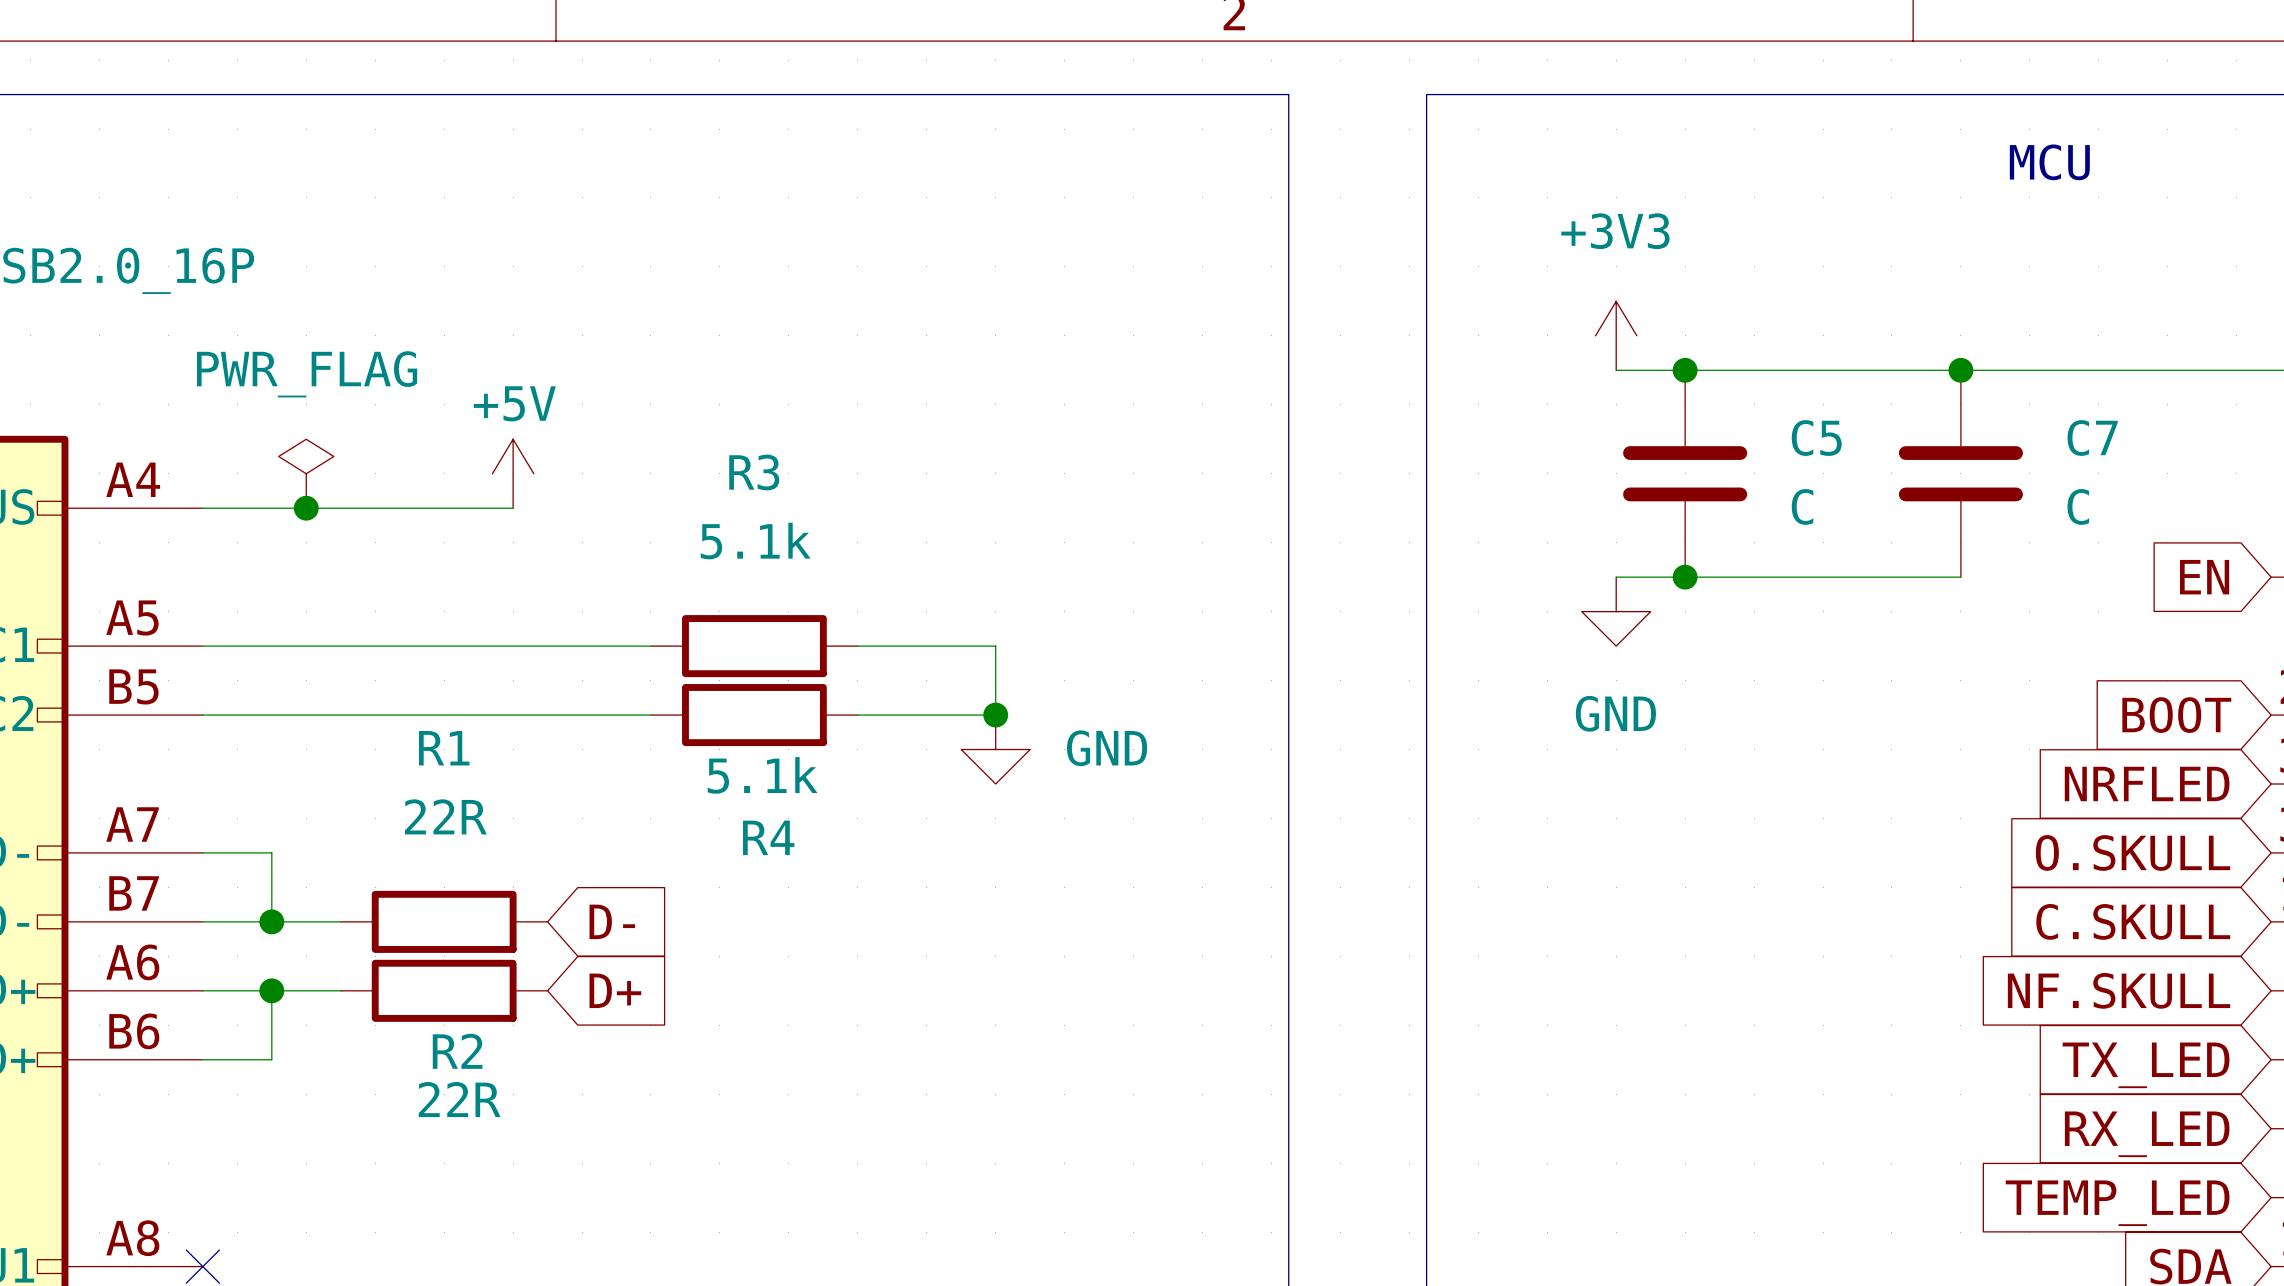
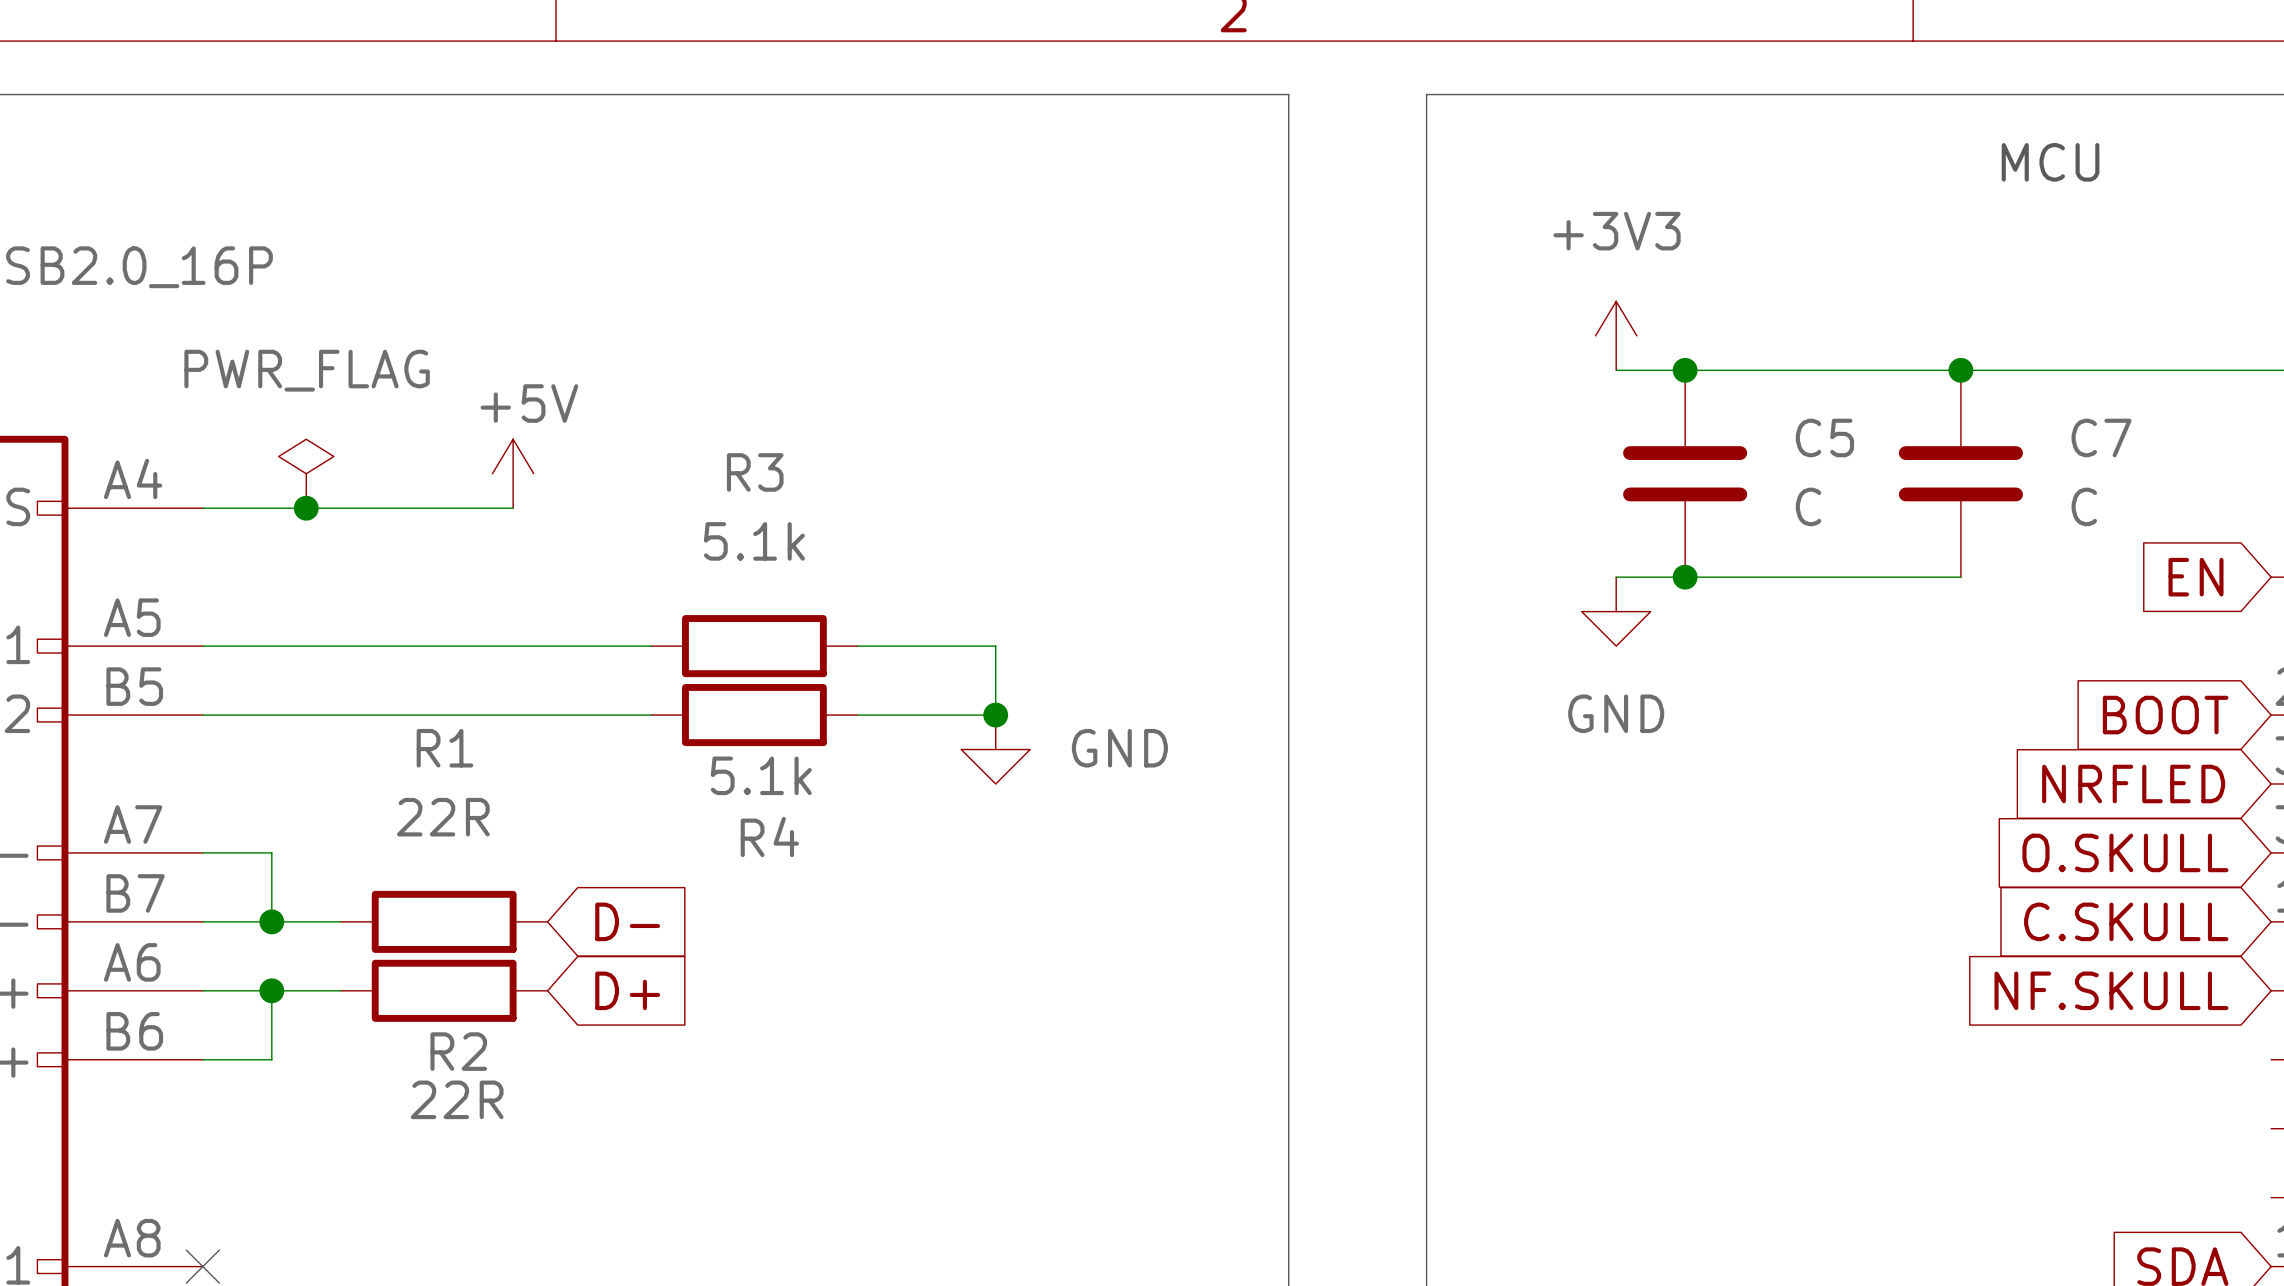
global label: TX_LED (2146, 1065) -> none
global label: RX_LED (2147, 1134) -> none
global label: TEMP_LED (2117, 1203) -> none

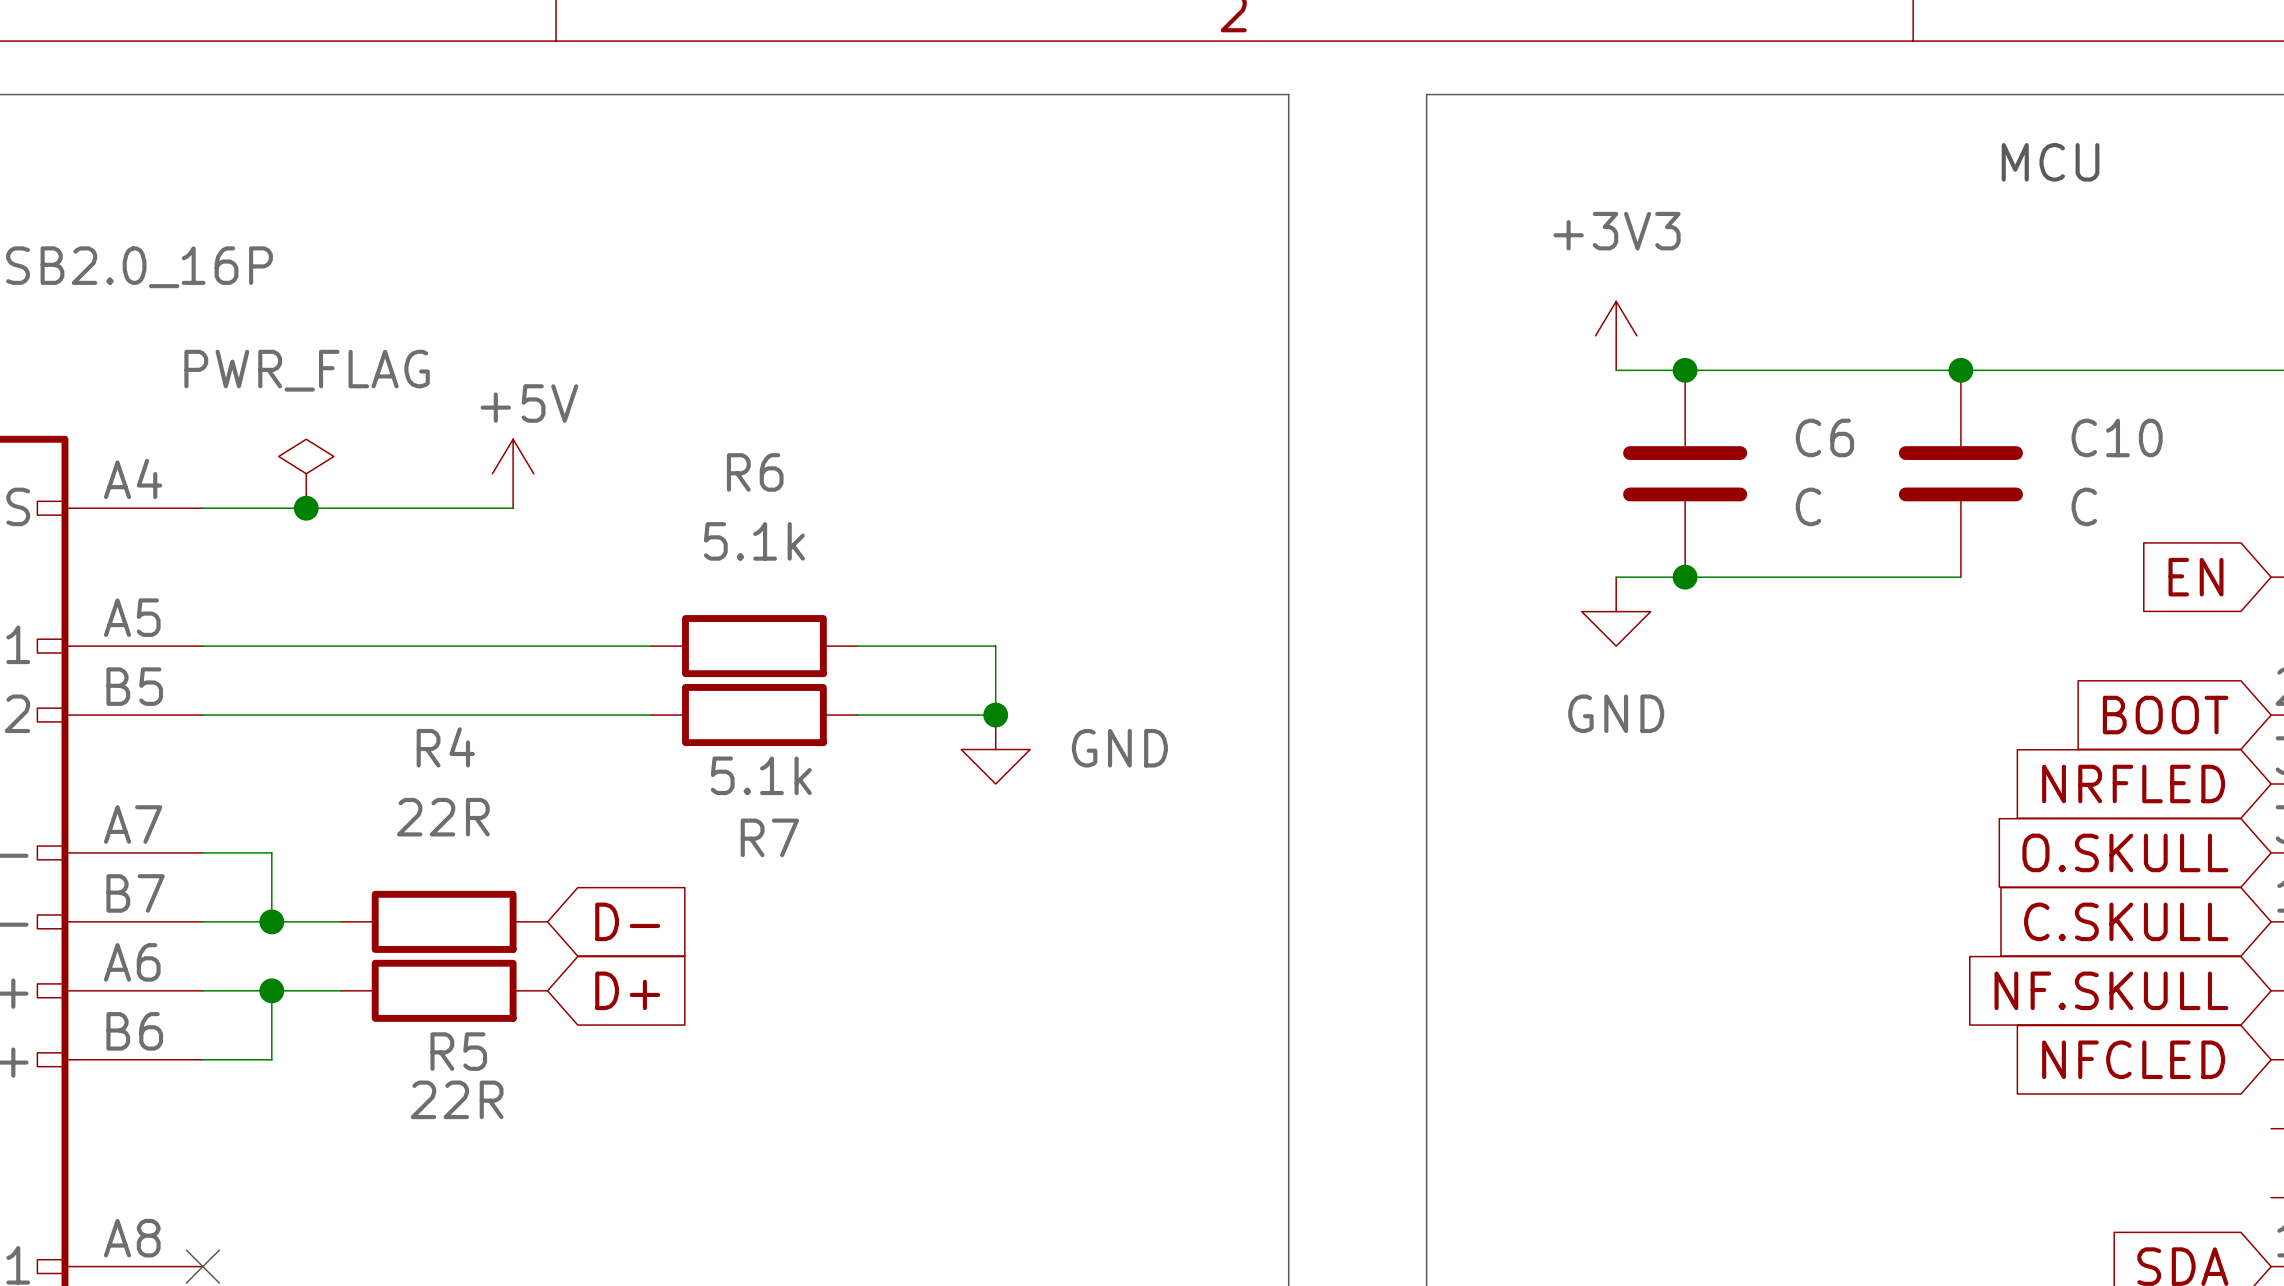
C5 name: C5 (1824, 437) -> C6 (1824, 437)
C7 name: C7 (2101, 437) -> C10 (2117, 437)
R3 name: R3 (755, 472) -> R6 (755, 472)
R1 name: R1 (444, 748) -> R4 (445, 747)
R4 name: R4 (769, 837) -> R7 (769, 837)
R2 name: R2 (458, 1051) -> R5 (458, 1051)
global label: none -> NFCLED (2133, 1059)

